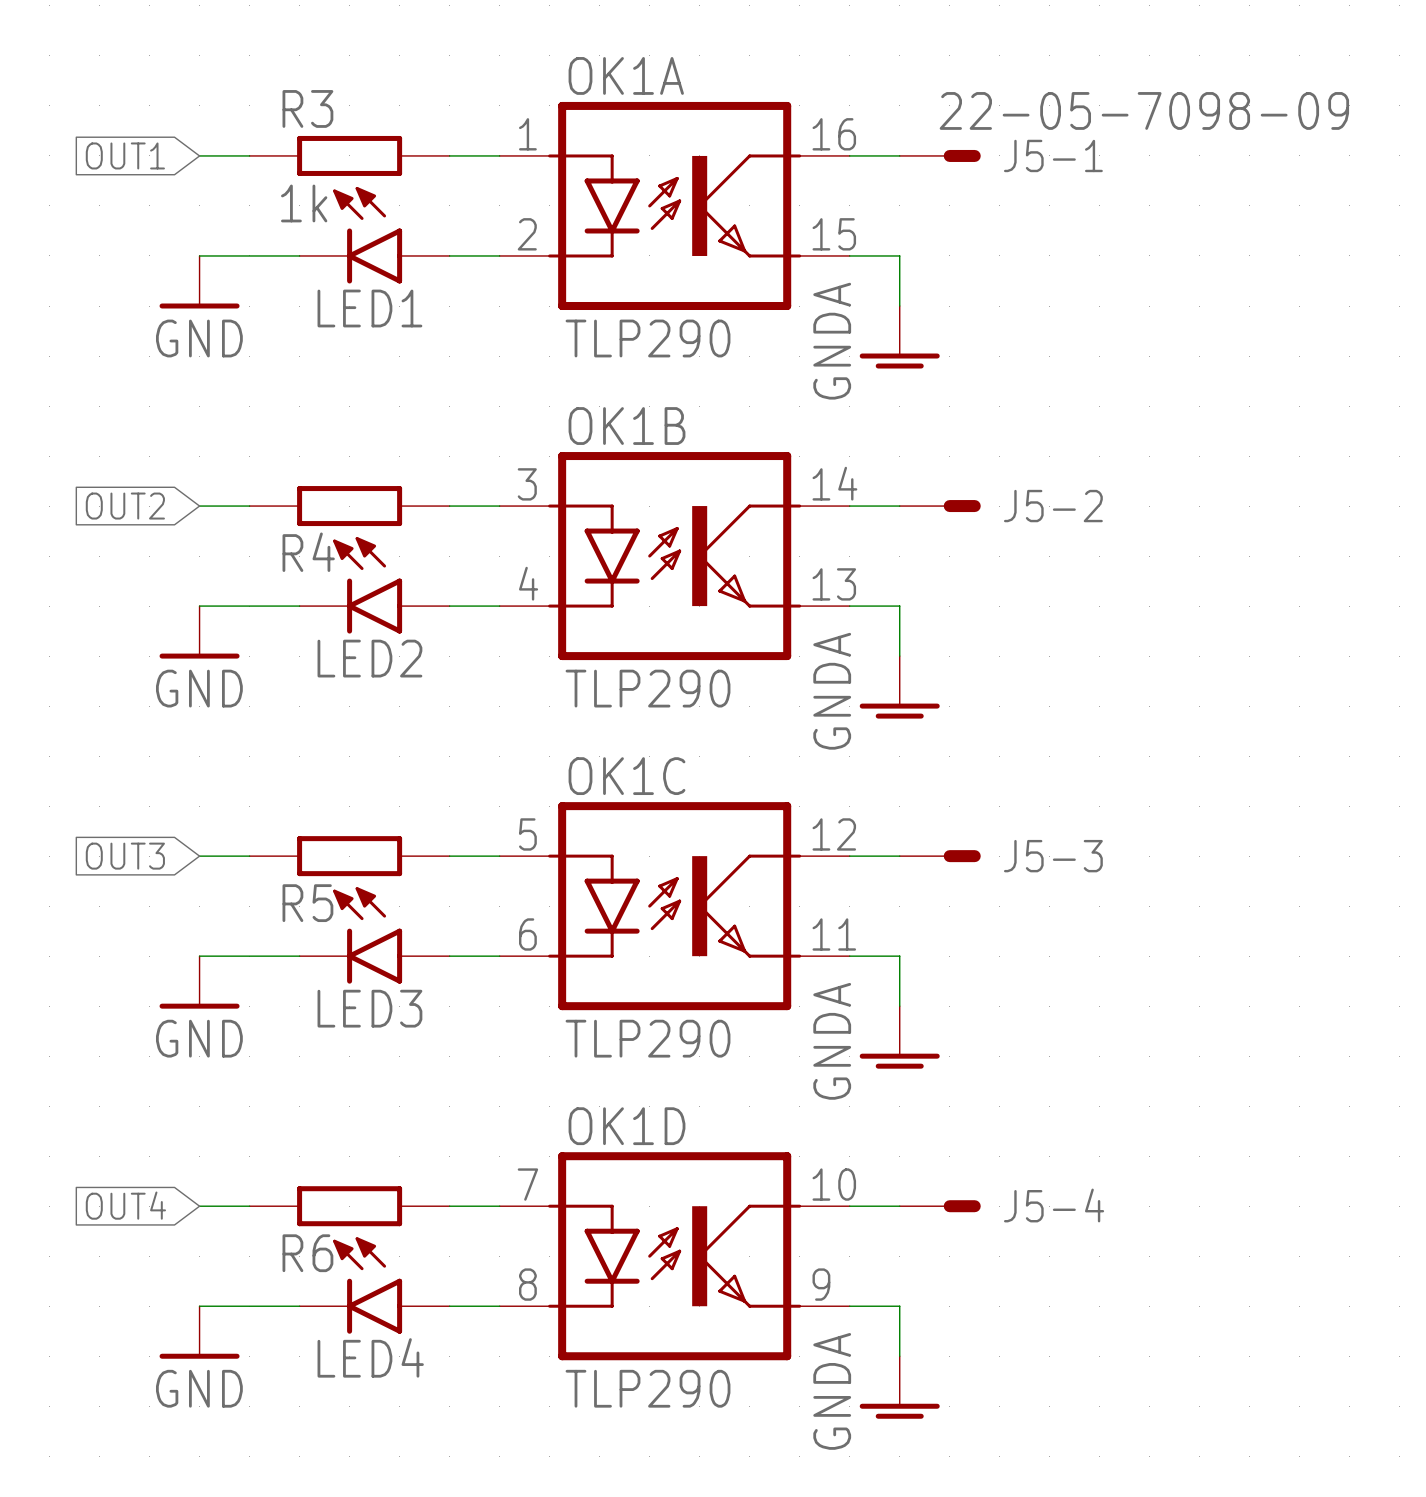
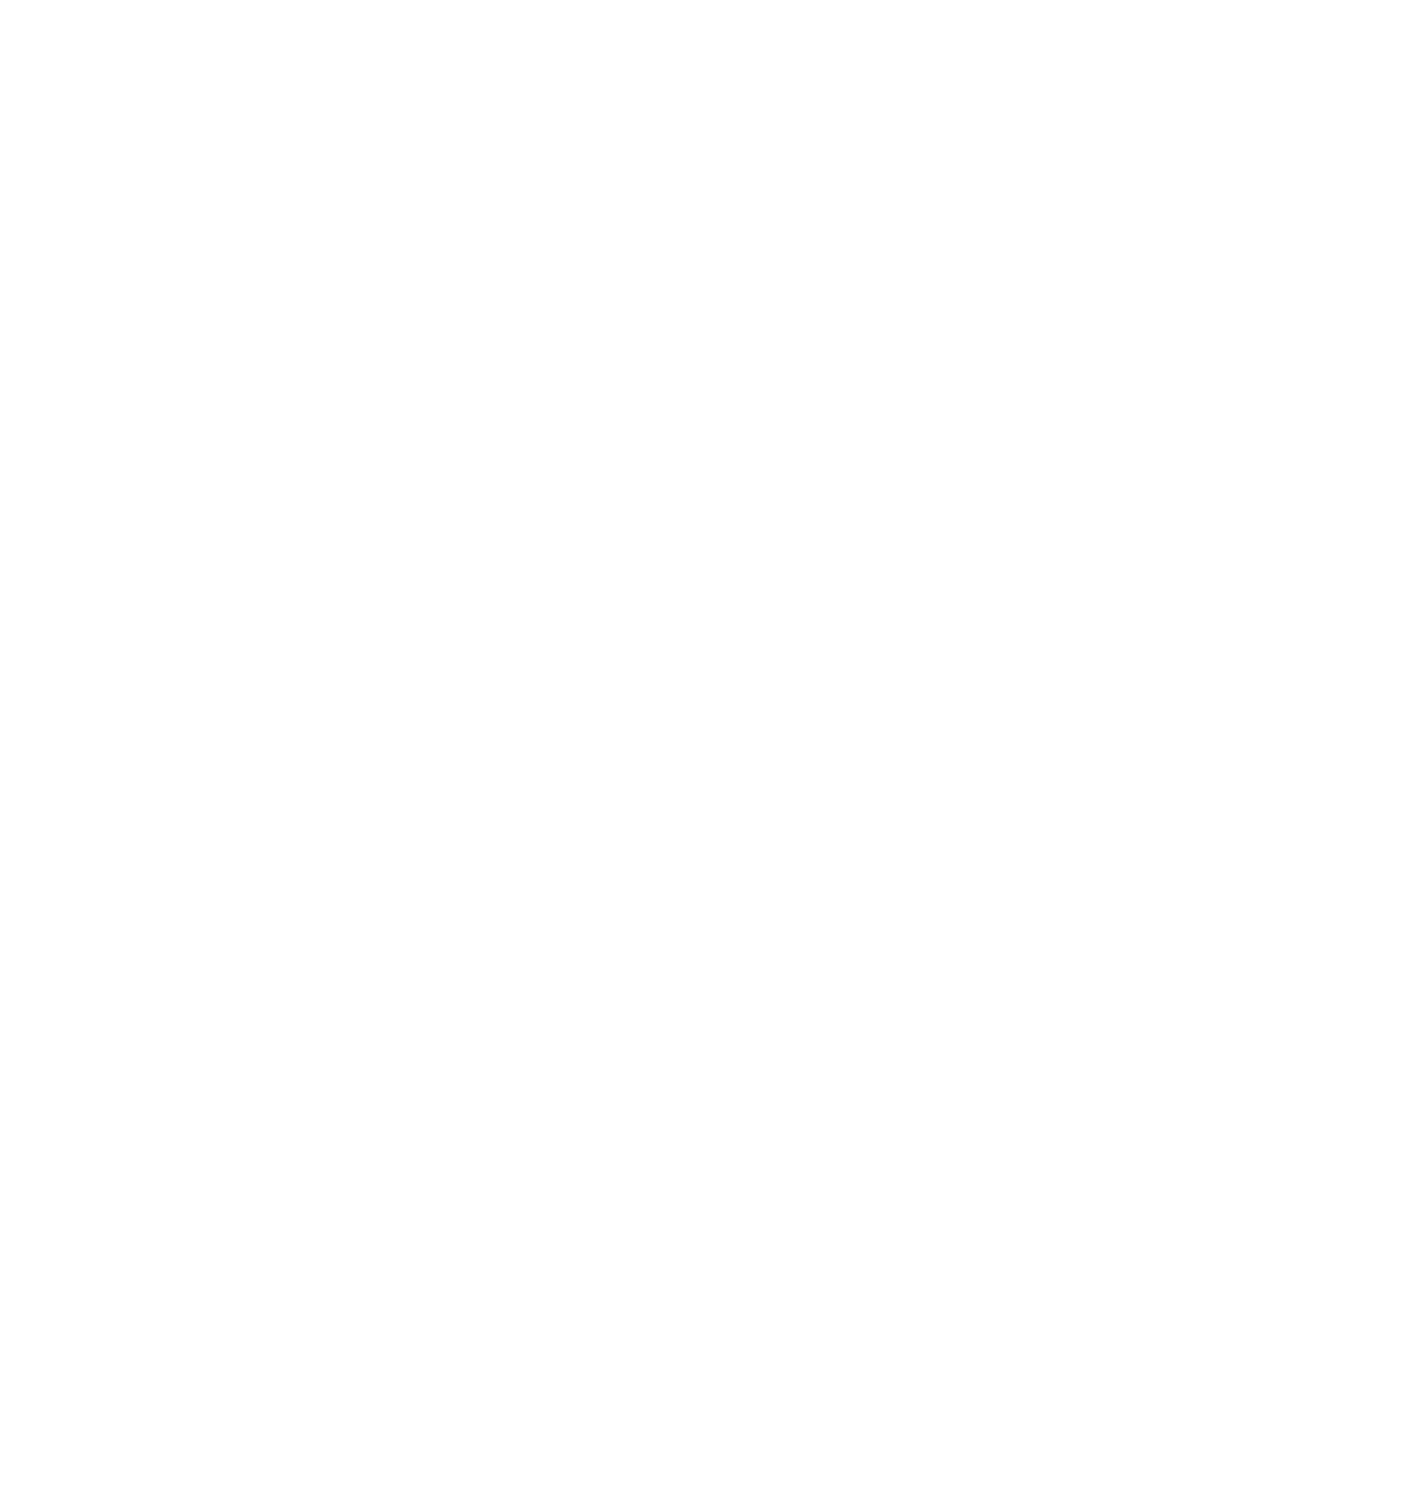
global label: OUT1 (125, 155) -> none
wire: (199, 155) (249, 155) -> none
R3: 1k (349, 155) -> none
wire: (449, 155) (499, 155) -> none
wire: (849, 155) (899, 155) -> none
J5-1: 22-05-7098-09 (940, 155) -> none
OK1A: TLP290 (674, 205) -> none
LED1: (374, 235) -> none
wire: (199, 255) (299, 255) -> none
wire: (449, 255) (499, 255) -> none
wire: (849, 255) (899, 255) (899, 306) -> none
power symbol: GND (199, 282) -> none
power symbol: GNDA (899, 337) -> none
global label: OUT2 (125, 506) -> none
wire: (199, 506) (249, 506) -> none
R4: (349, 506) -> none
wire: (449, 506) (499, 506) -> none
wire: (849, 506) (899, 506) -> none
J5-2: (940, 506) -> none
OK1B: TLP290 (674, 556) -> none
LED2: (374, 585) -> none
wire: (199, 606) (299, 606) -> none
wire: (449, 606) (499, 606) -> none
wire: (849, 606) (899, 606) (899, 656) -> none
power symbol: GND (199, 632) -> none
power symbol: GNDA (899, 687) -> none
global label: OUT3 (125, 856) -> none
wire: (199, 856) (249, 856) -> none
R5: (349, 856) -> none
wire: (449, 856) (499, 856) -> none
wire: (849, 856) (899, 856) -> none
J5-3: (940, 856) -> none
OK1C: TLP290 (674, 906) -> none
LED3: (374, 935) -> none
wire: (199, 956) (299, 956) -> none
wire: (449, 956) (499, 956) -> none
wire: (849, 956) (899, 956) (899, 1006) -> none
power symbol: GND (199, 982) -> none
power symbol: GNDA (899, 1037) -> none
global label: OUT4 (125, 1205) -> none
wire: (199, 1206) (249, 1206) -> none
R6: (349, 1206) -> none
wire: (449, 1206) (499, 1206) -> none
wire: (849, 1206) (899, 1206) -> none
J5-4: (940, 1206) -> none
OK1D: TLP290 (674, 1256) -> none
LED4: (374, 1285) -> none
wire: (199, 1306) (299, 1306) -> none
wire: (449, 1306) (499, 1306) -> none
wire: (849, 1306) (899, 1306) (899, 1356) -> none
power symbol: GND (199, 1332) -> none
power symbol: GNDA (899, 1387) -> none

